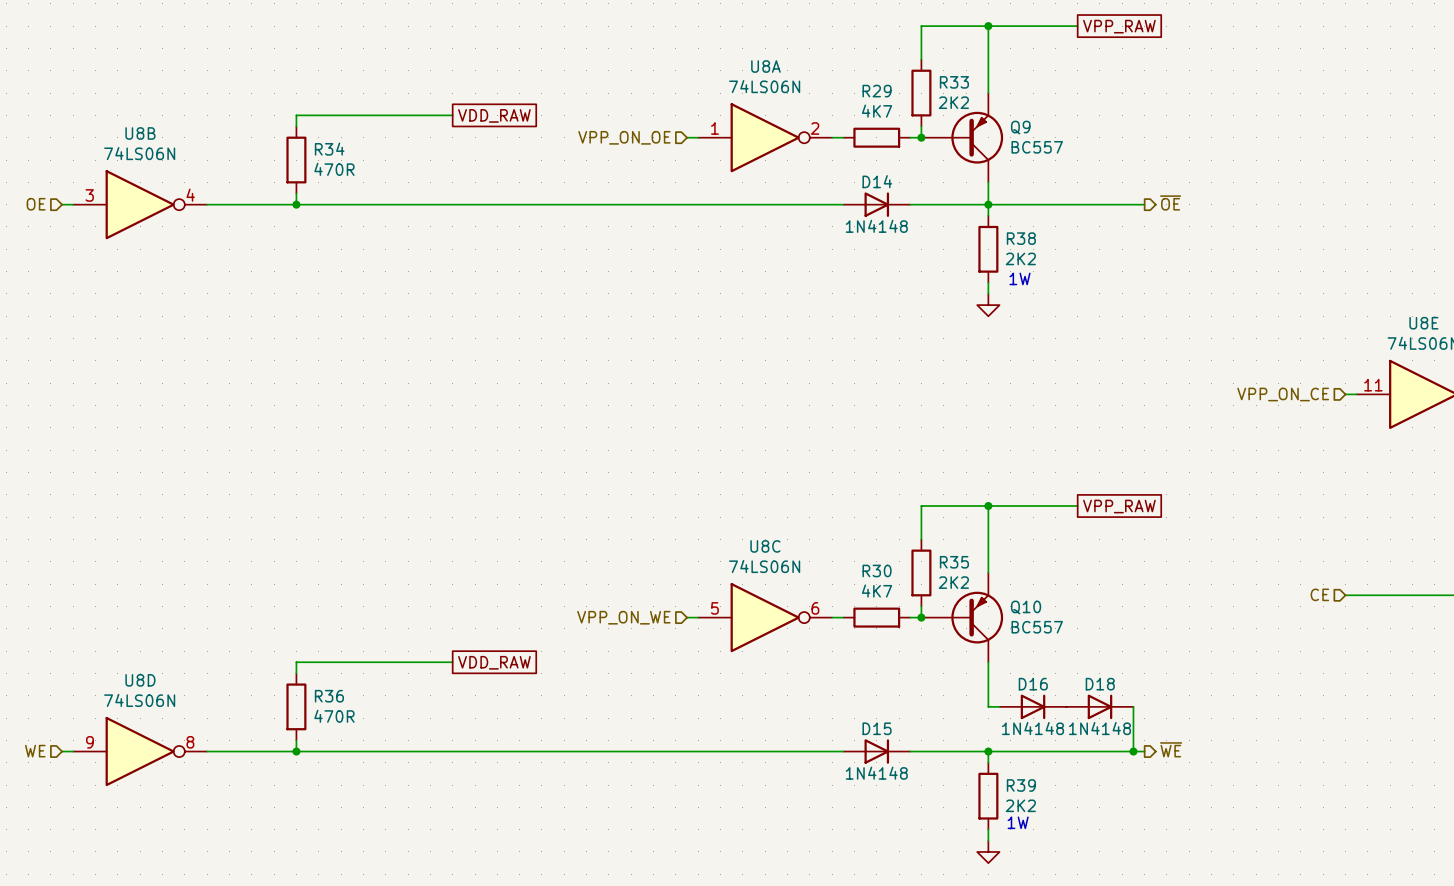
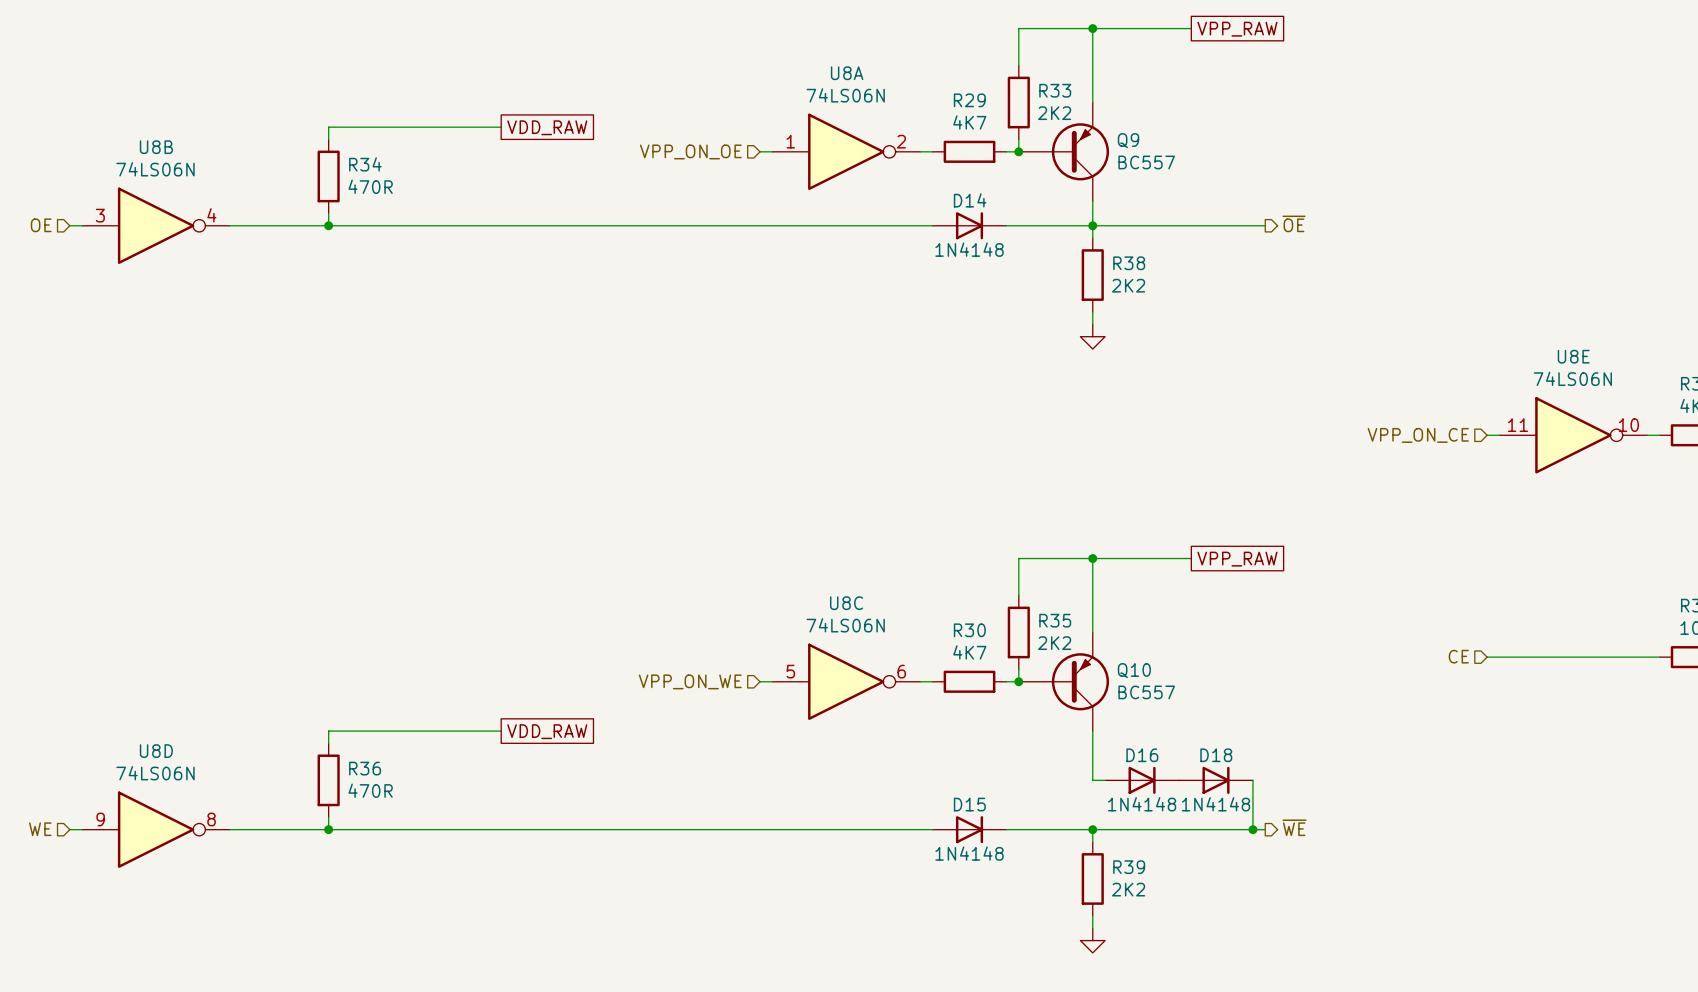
text: 1W (1019, 278) -> none
text: 1W (1018, 822) -> none

